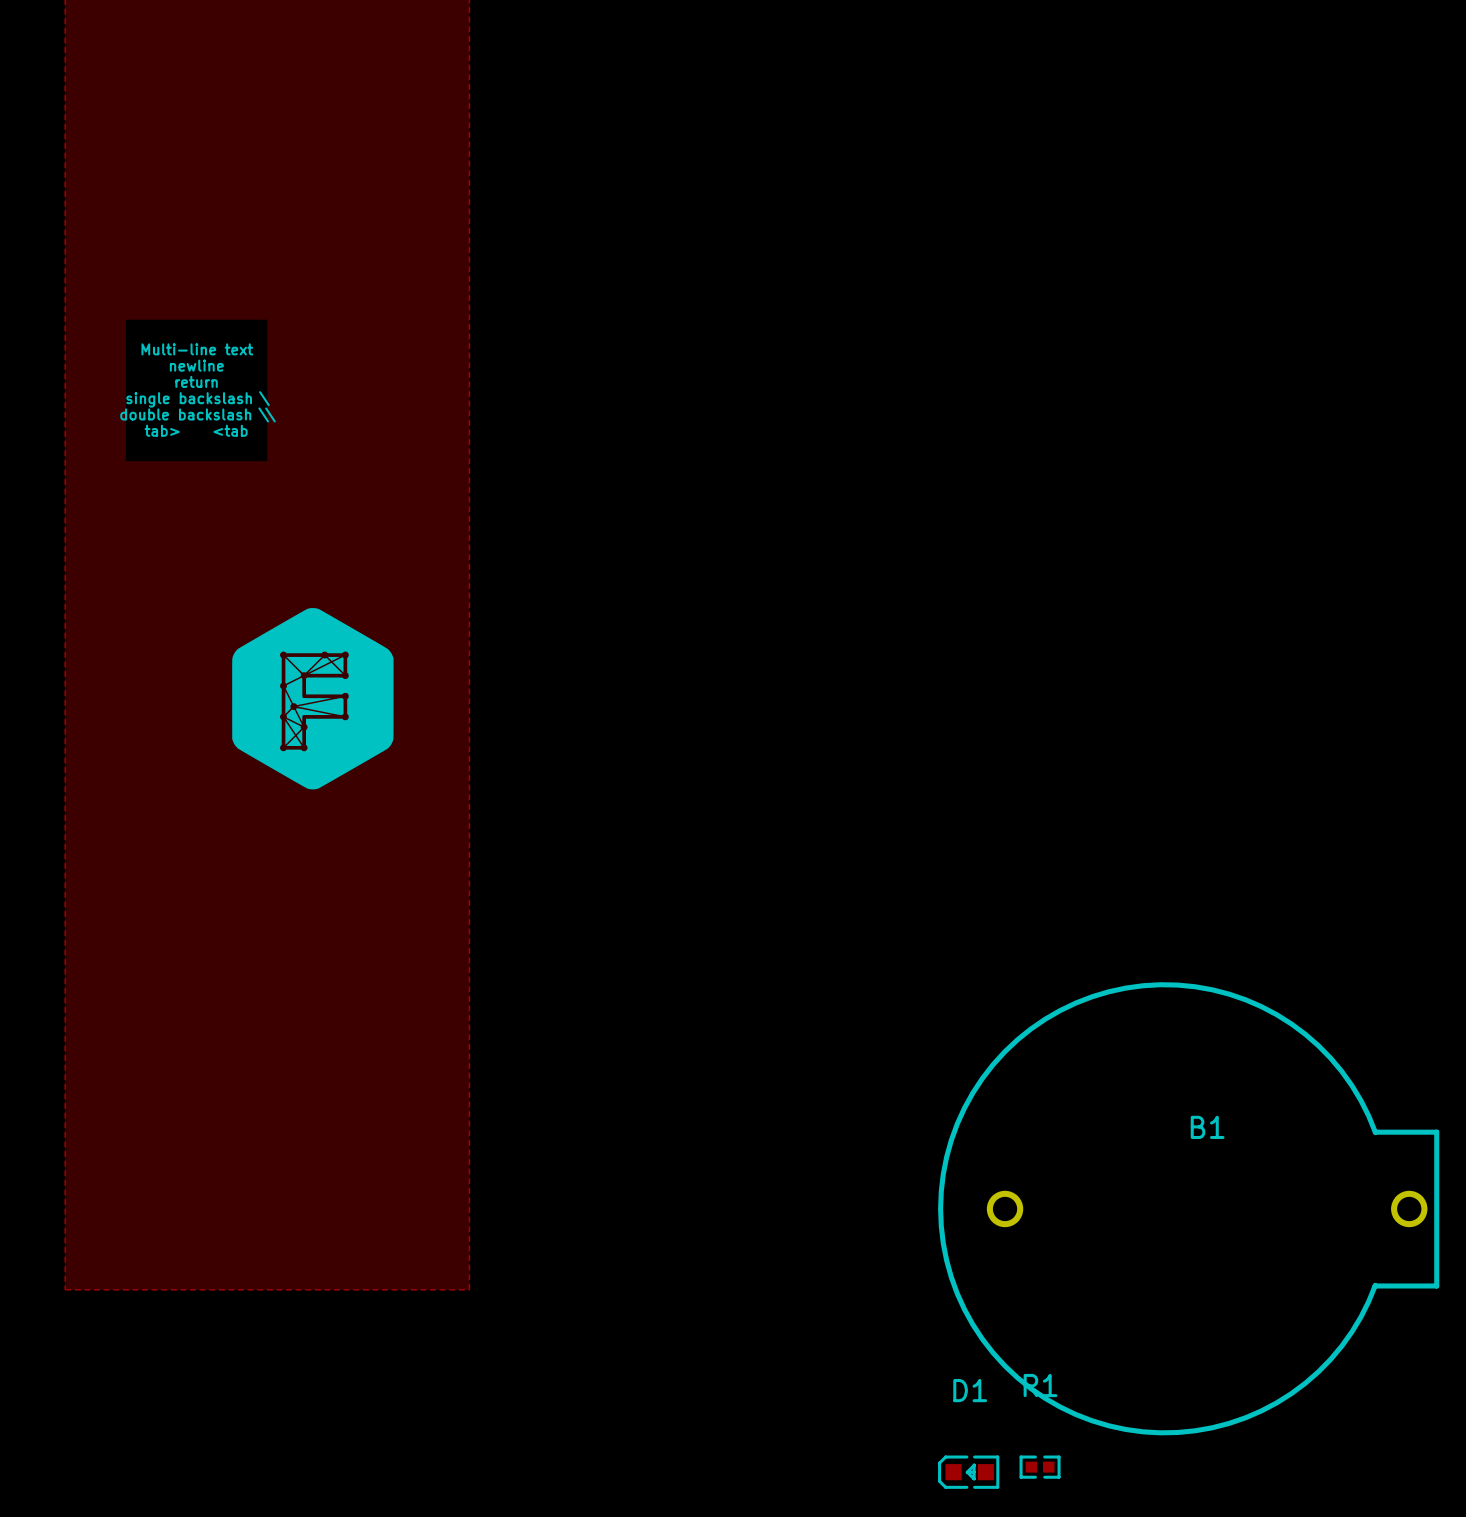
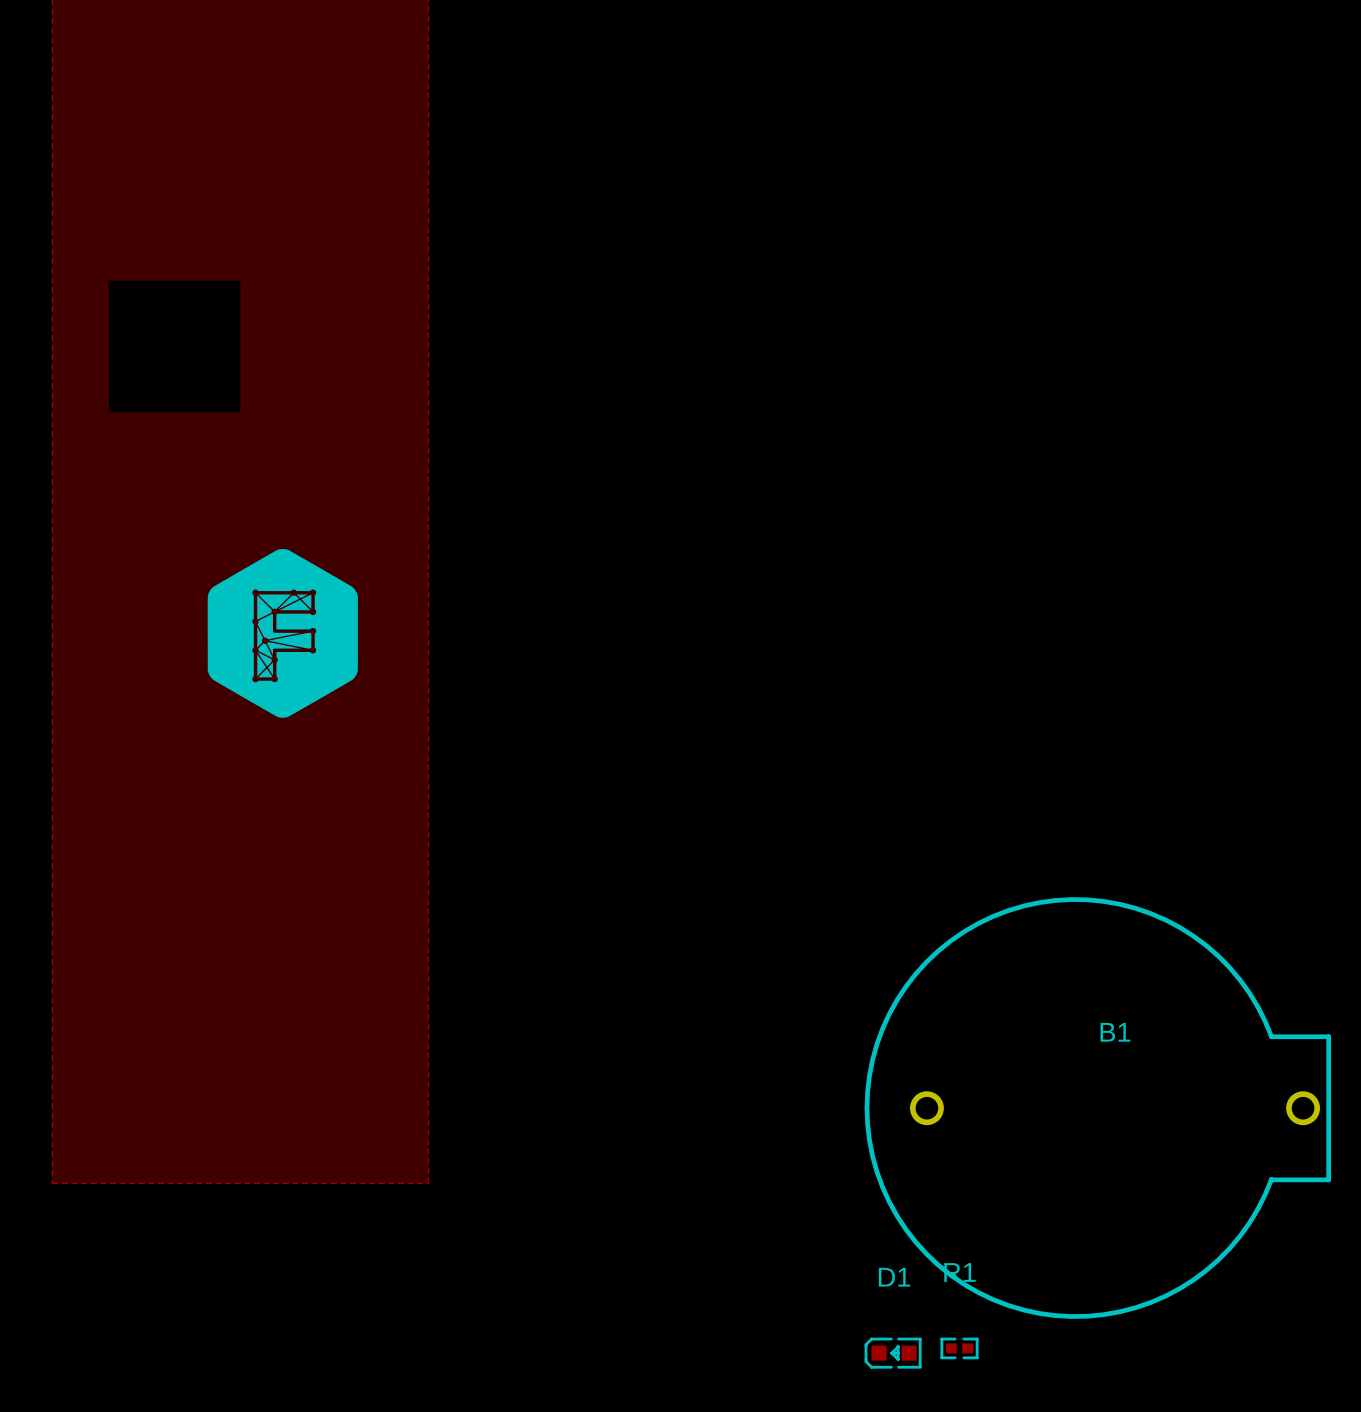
text: Multi-line text (197, 349) -> none
text: newline (196, 365) -> none
text: return (196, 381) -> none
text: single backslash \ (198, 399) -> none
text: double backslash \\ (198, 414) -> none
text: tab> <tab (196, 430) -> none

